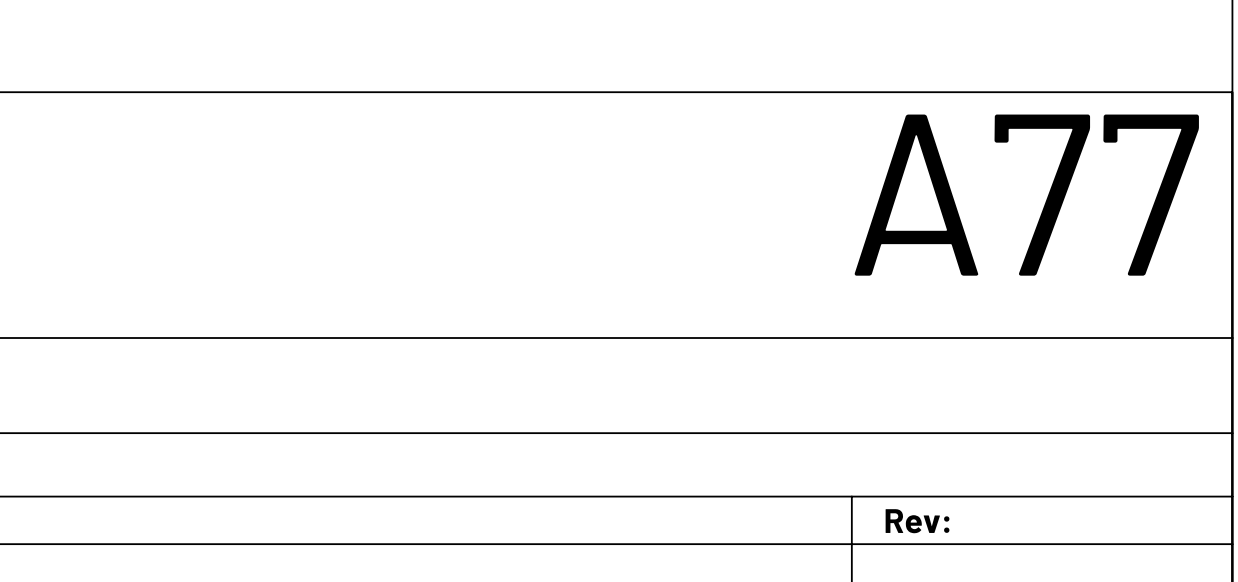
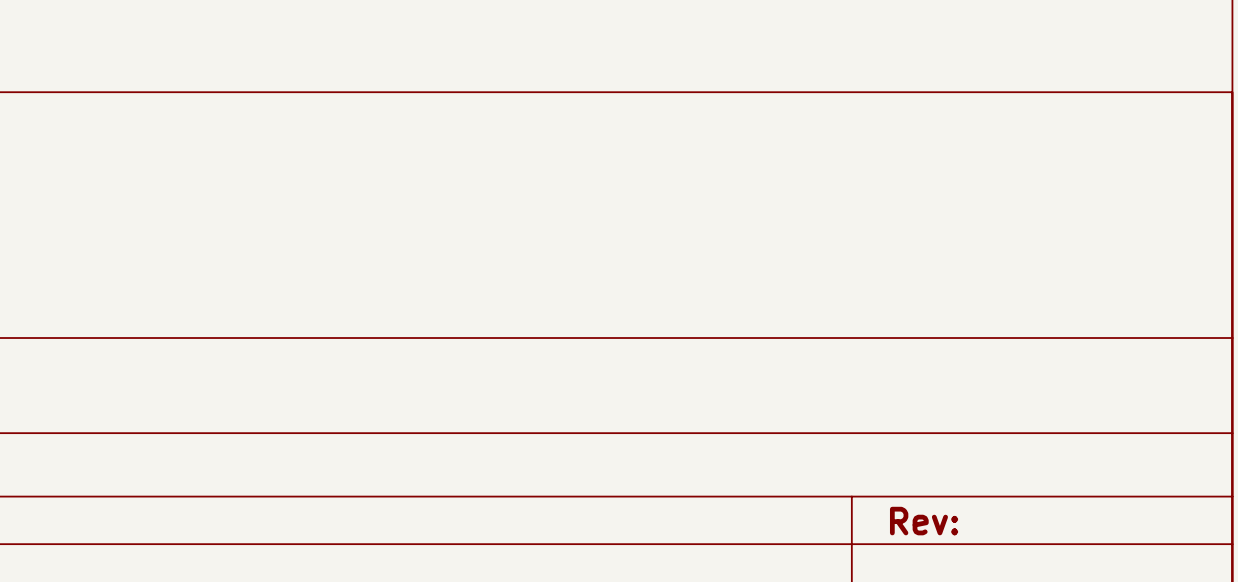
text: A77 (1026, 195) -> none

